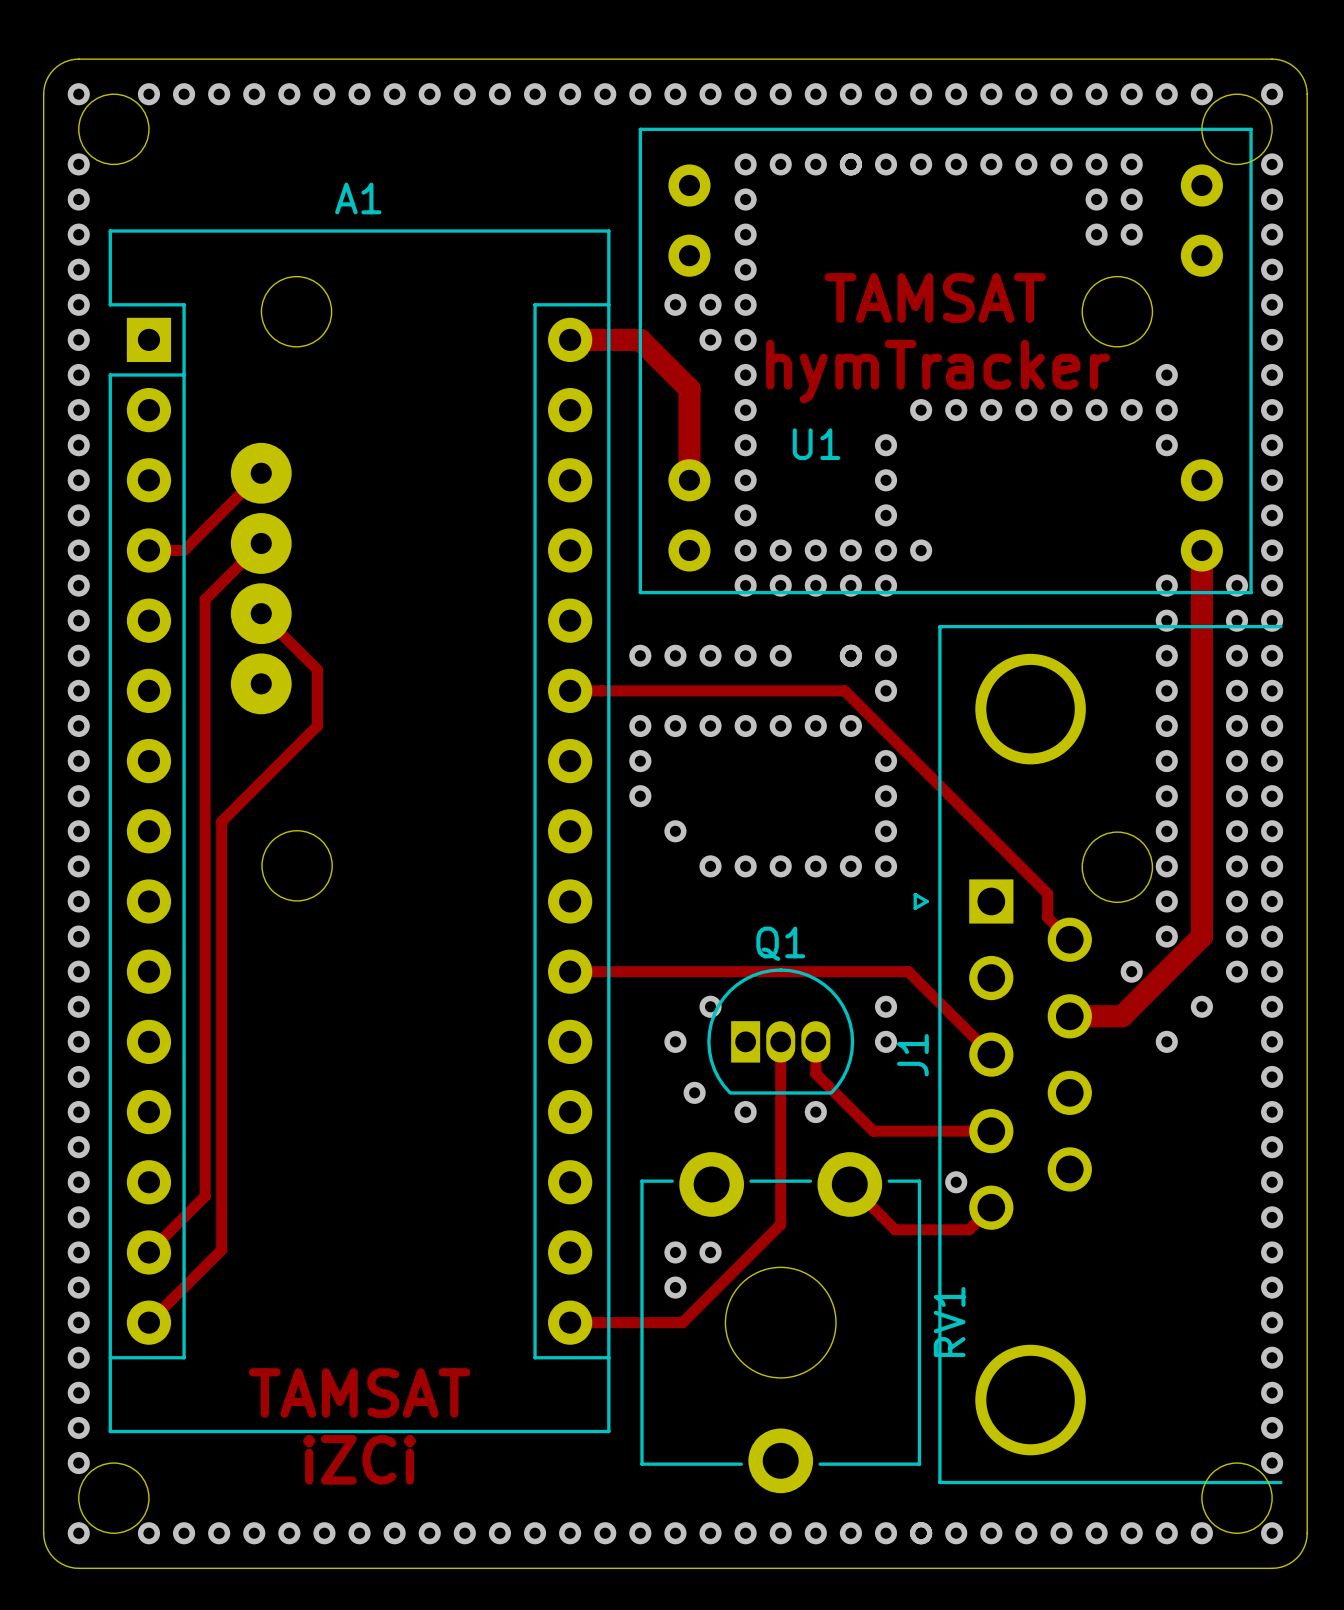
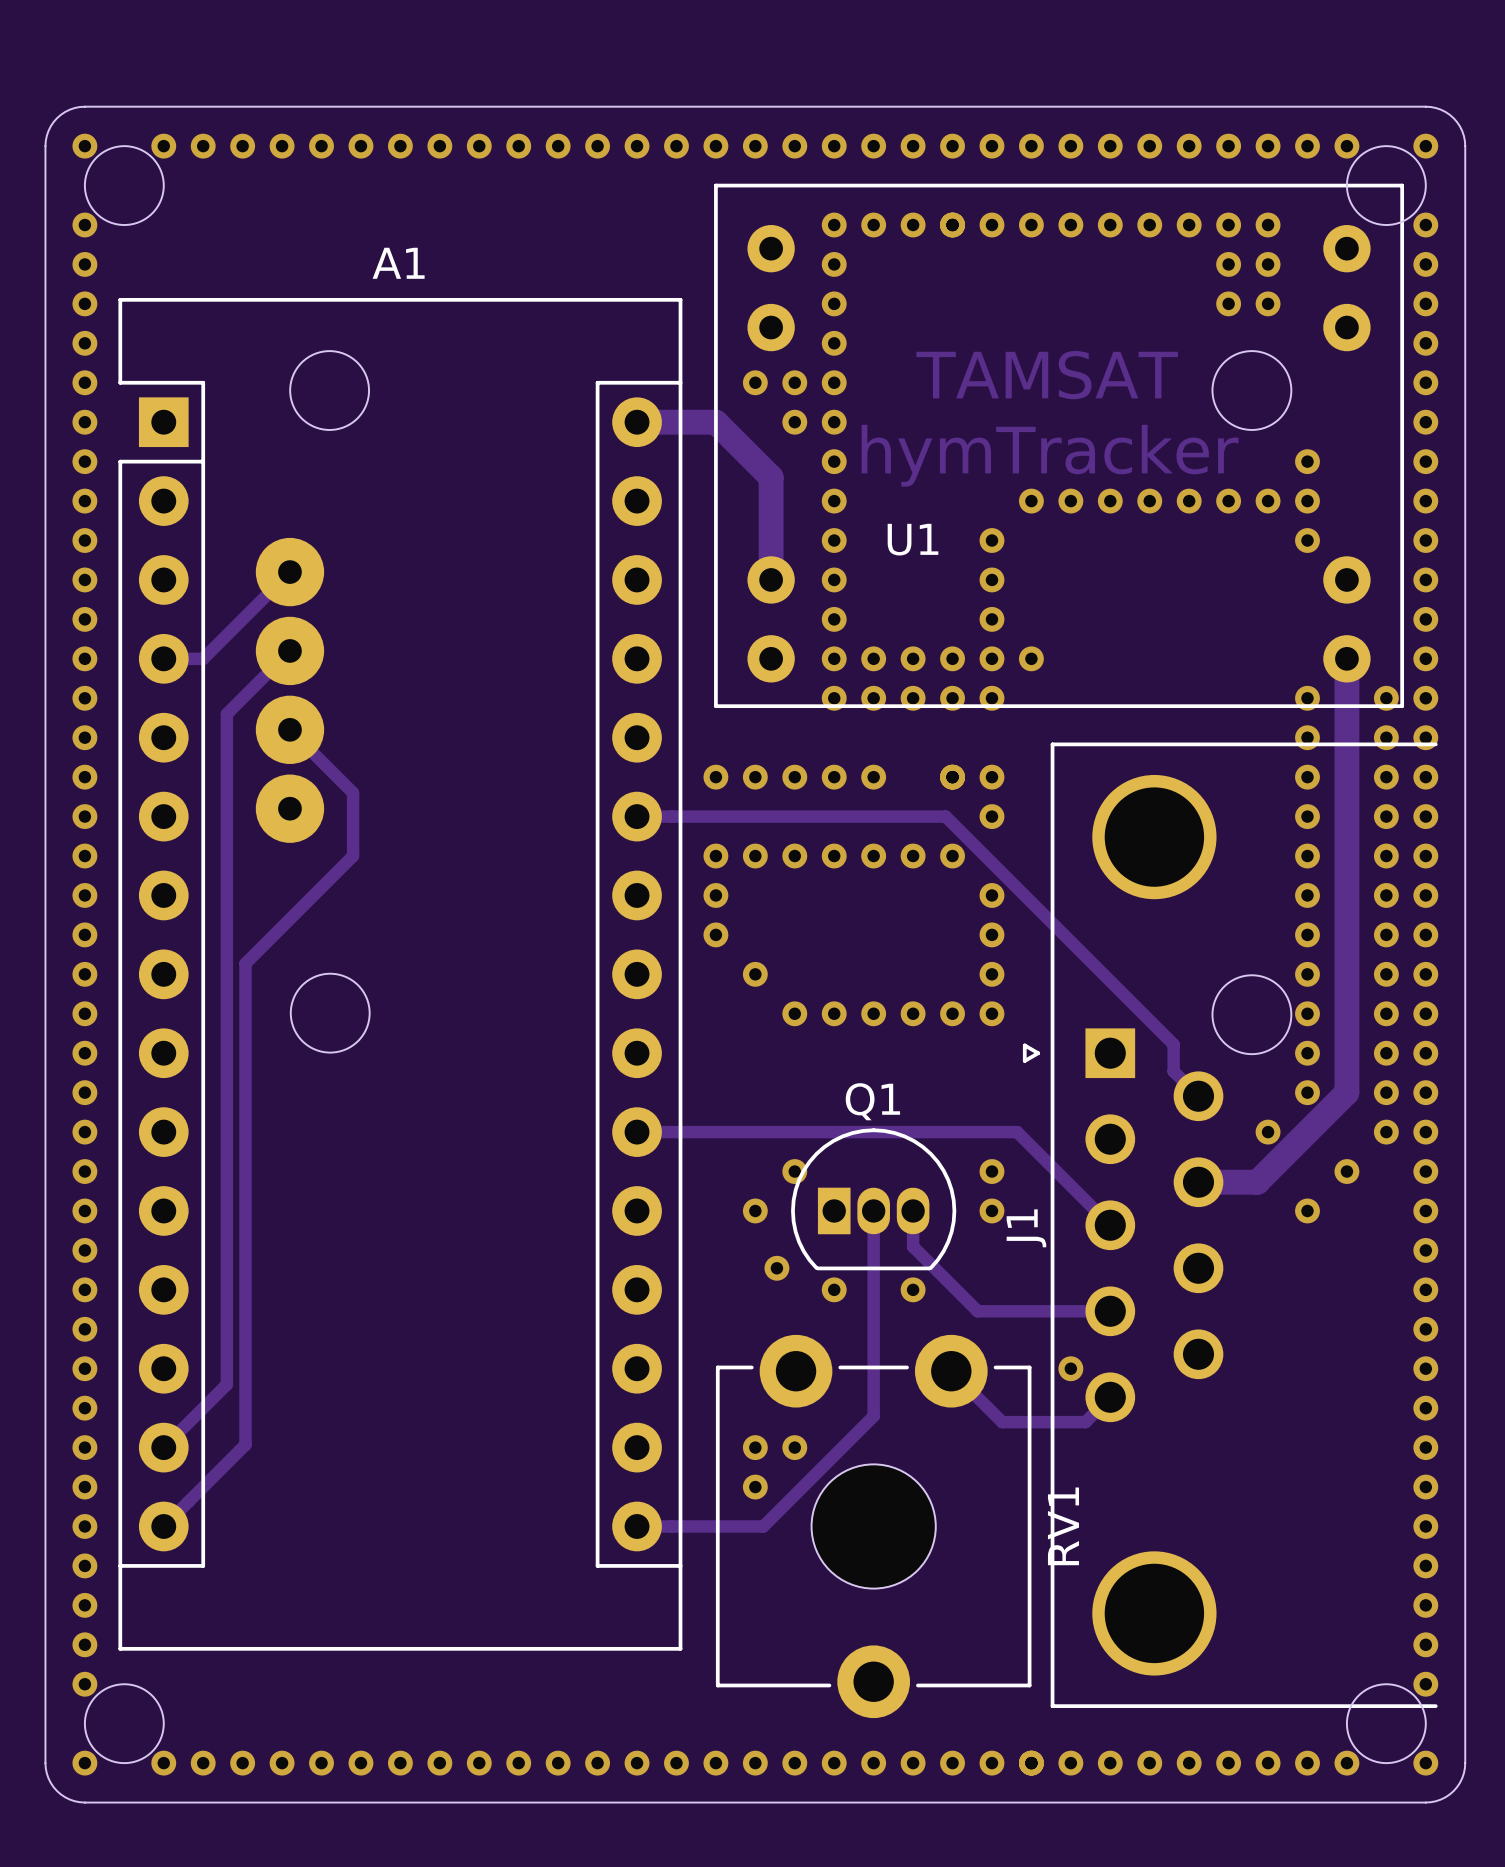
text: TAMSAT (359, 1393) -> none
text: iZCi (359, 1459) -> none

